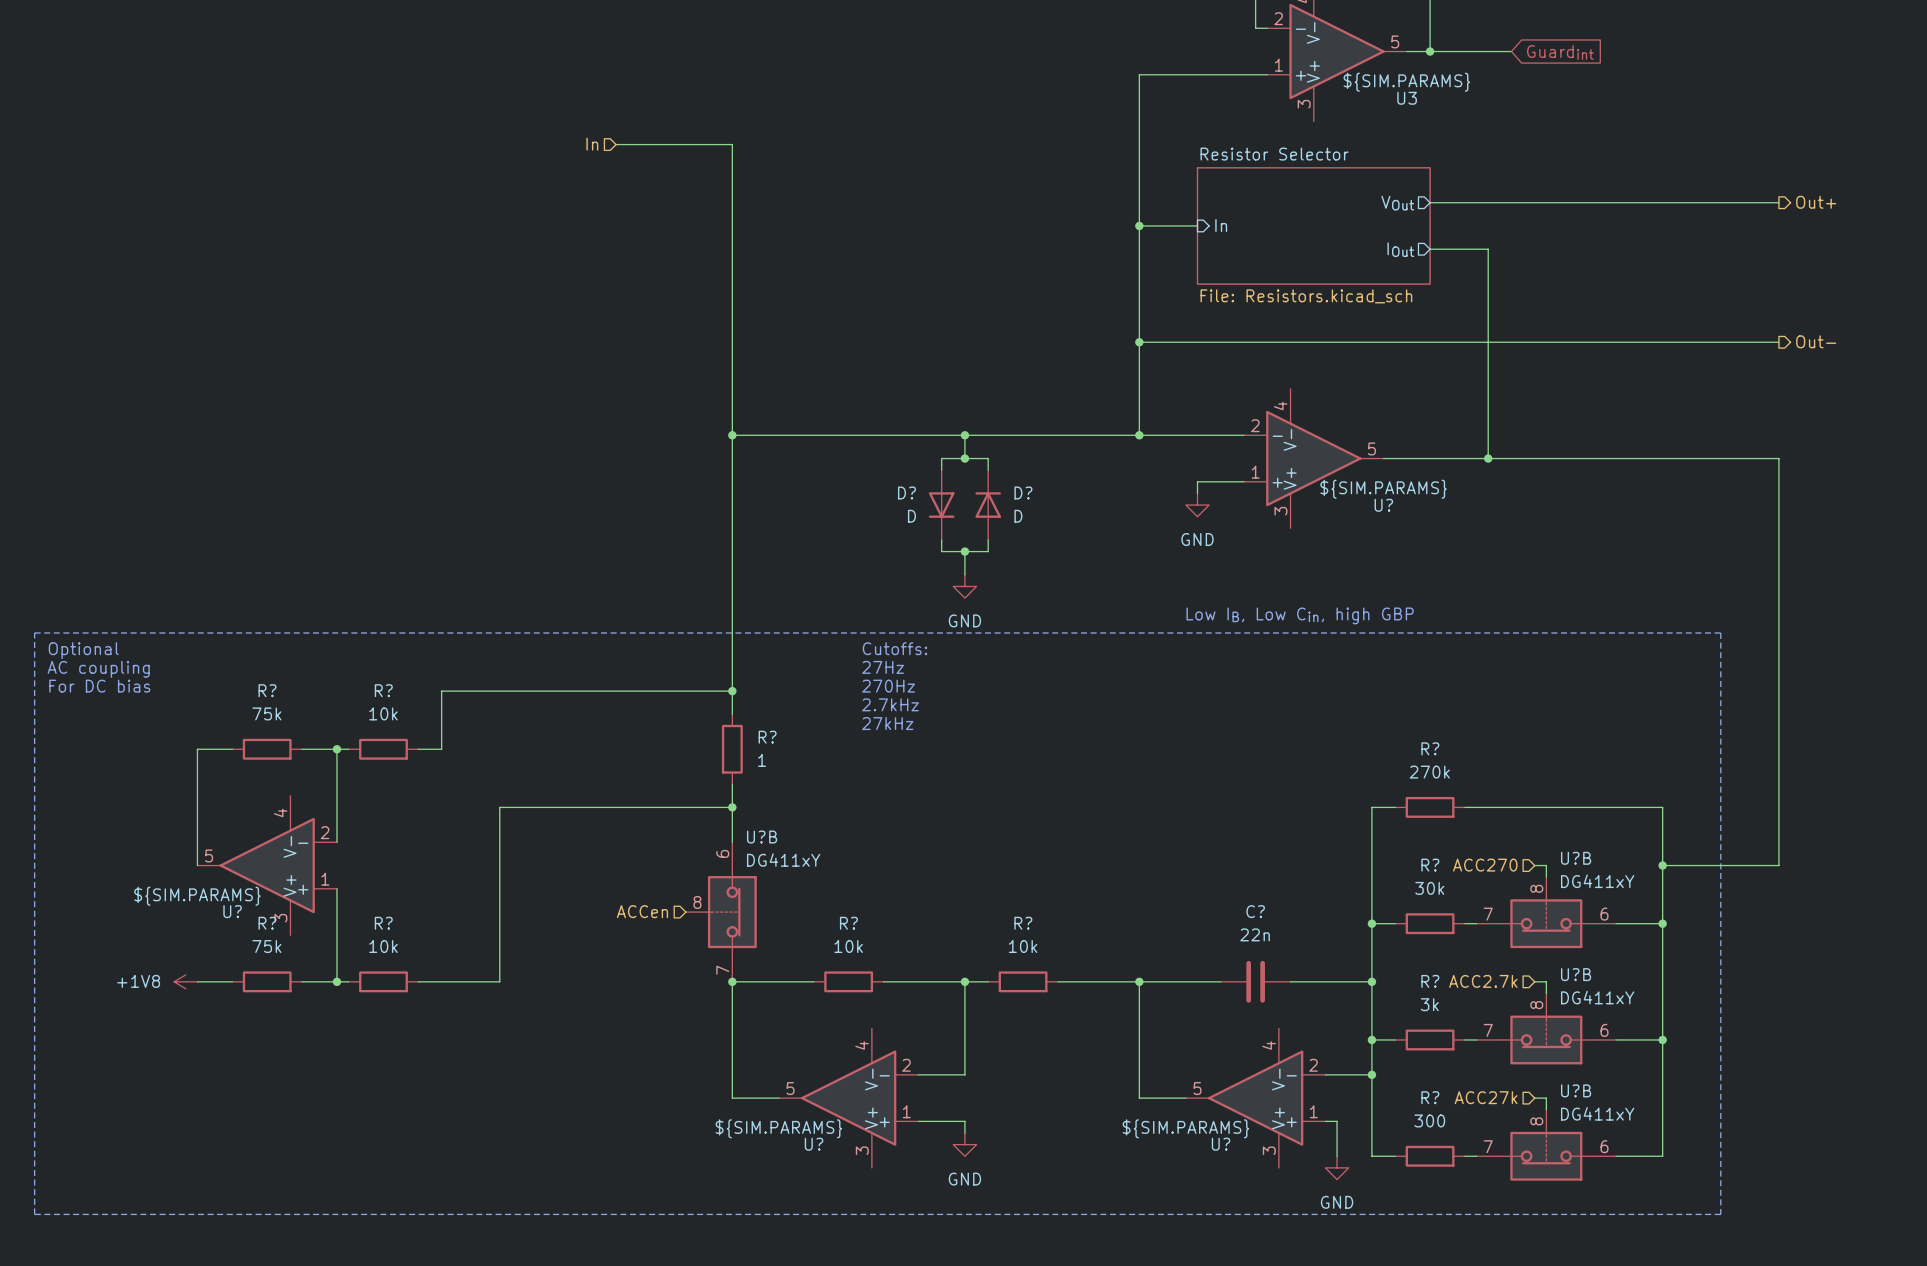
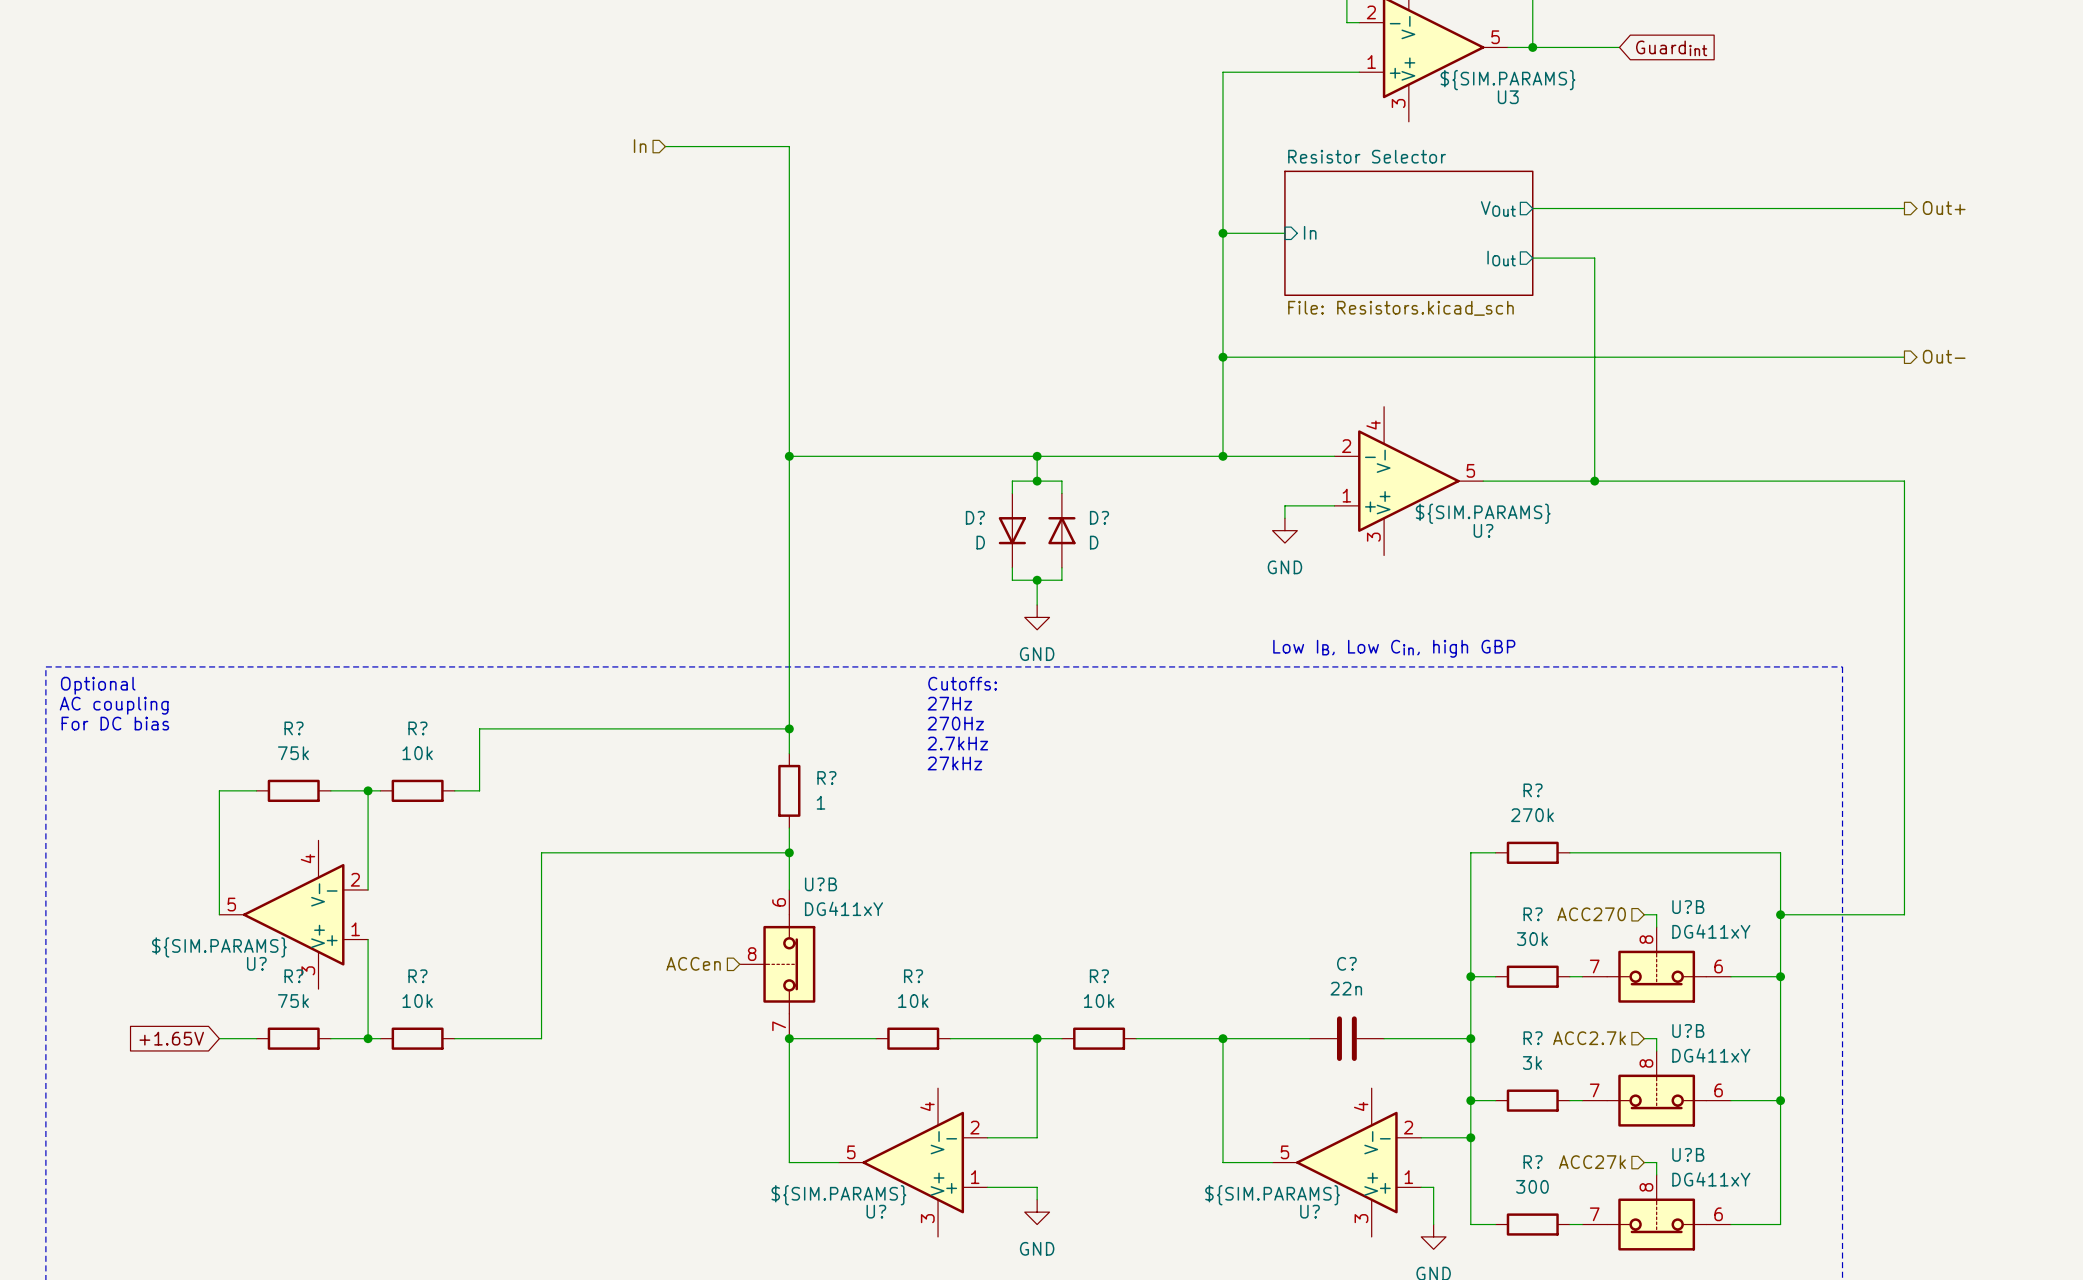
global label: none -> +1.65V (171, 1038)
power symbol: +1V8 (185, 981) -> none

